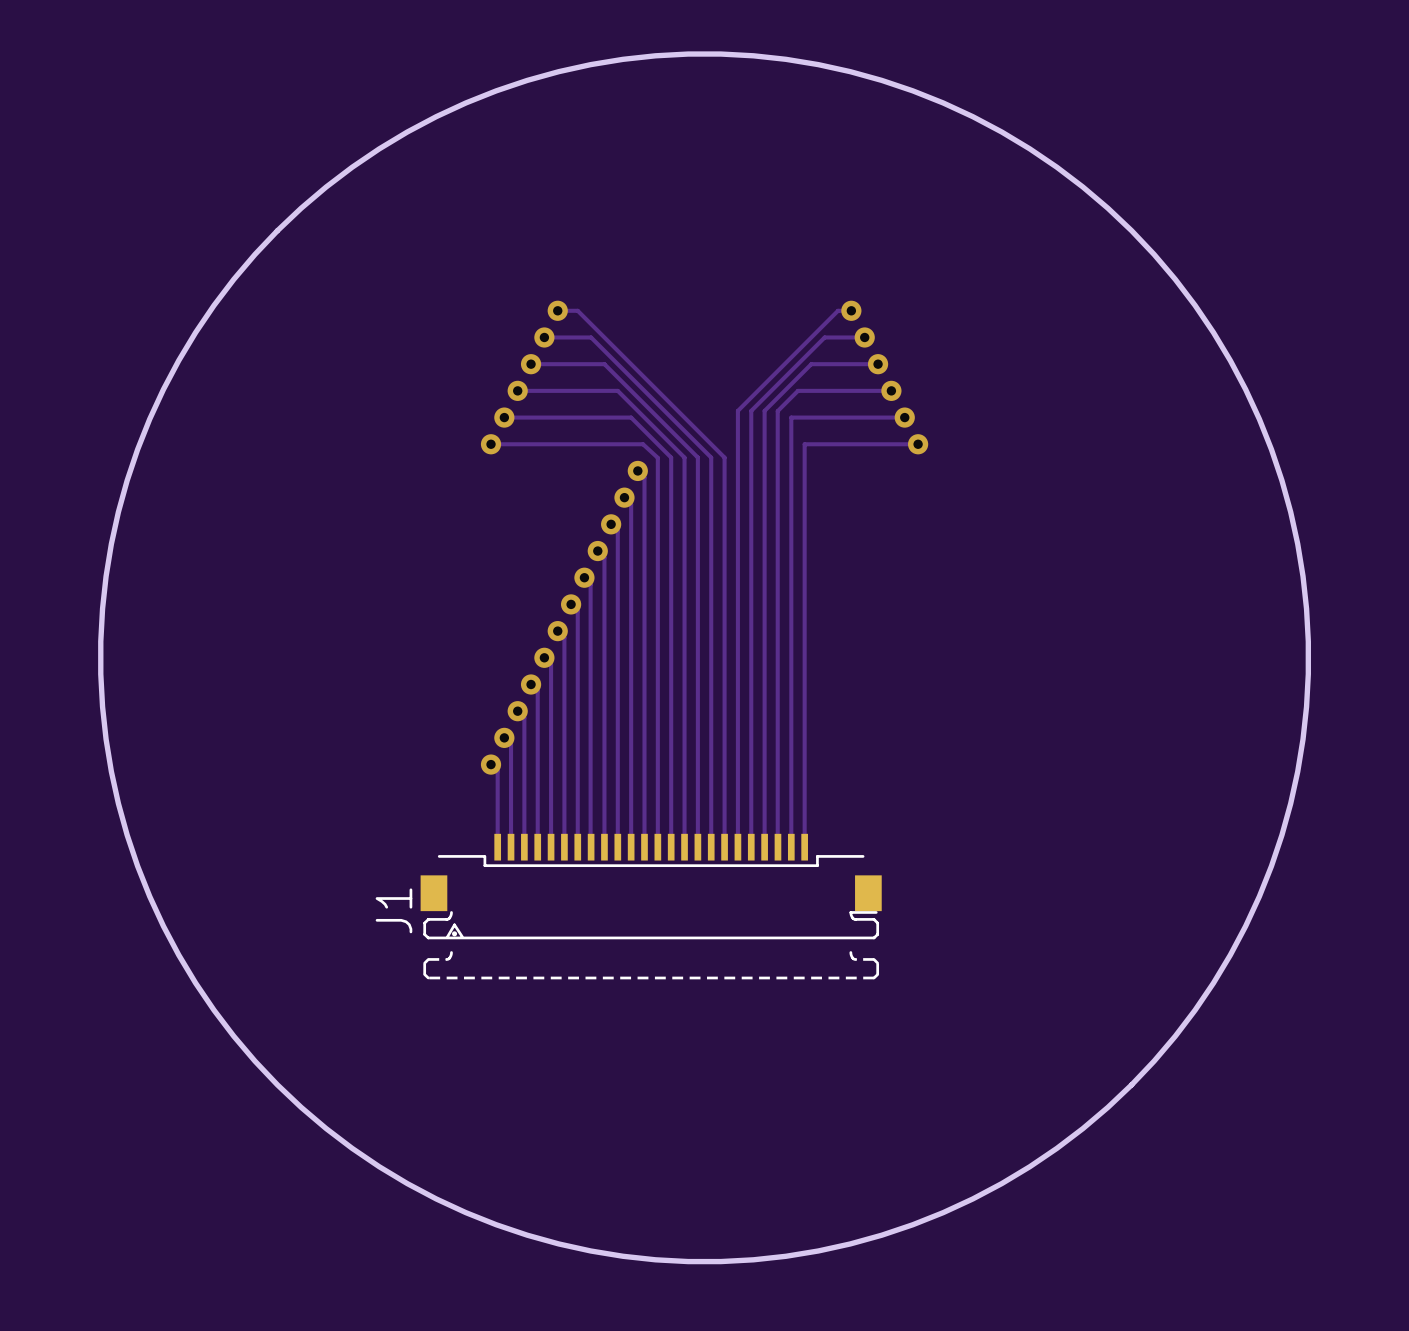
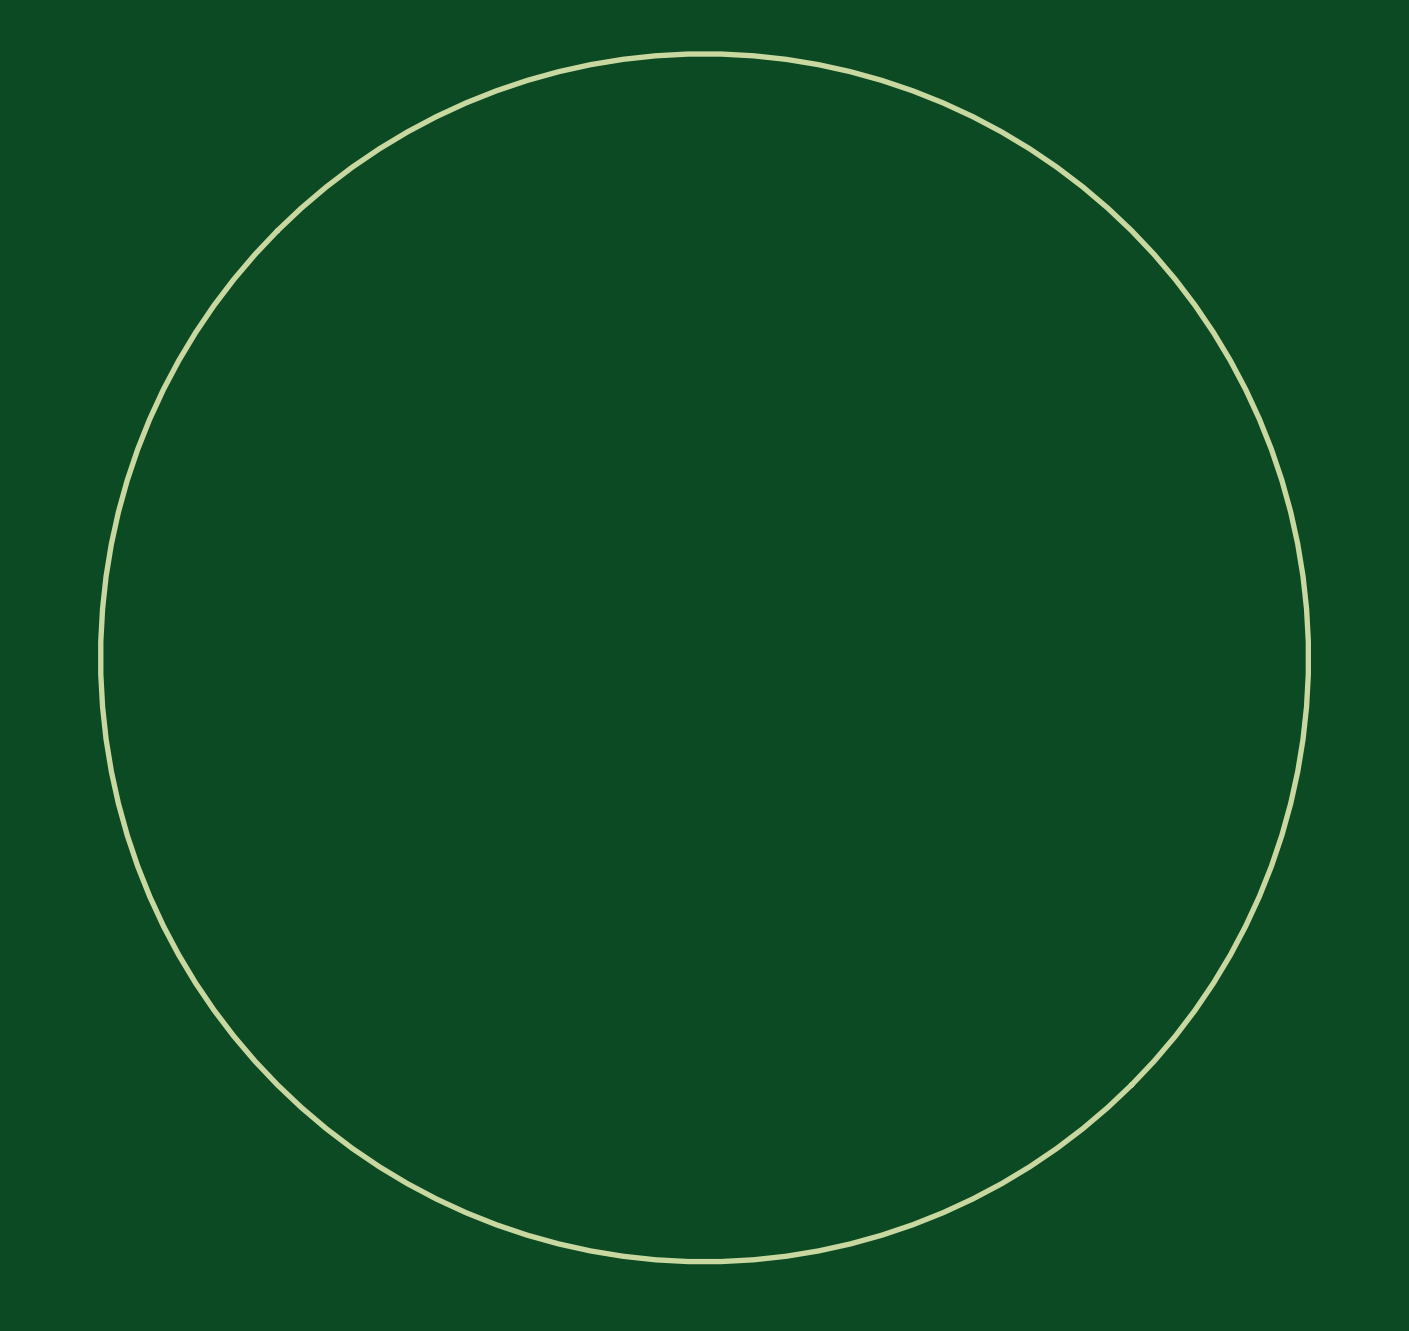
track: (557, 310) (577, 310) (724, 457) (724, 847) -> none
via: (557, 310) -> none
track: (851, 310) (838, 310) (737, 410) (737, 847) -> none
via: (851, 310) -> none
track: (544, 337) (591, 337) (711, 457) (711, 847) -> none
via: (544, 337) -> none
track: (864, 337) (824, 337) (751, 410) (751, 847) -> none
via: (864, 337) -> none
track: (531, 364) (604, 364) (697, 457) (697, 847) -> none
via: (531, 364) -> none
track: (878, 364) (811, 364) (764, 410) (764, 847) -> none
via: (878, 364) -> none
track: (517, 390) (617, 390) (684, 457) (684, 847) -> none
via: (517, 390) -> none
track: (891, 390) (797, 390) (777, 411) (777, 847) -> none
via: (891, 390) -> none
track: (504, 417) (631, 417) (671, 457) (671, 847) -> none
via: (504, 417) -> none
track: (904, 417) (791, 417) (791, 847) -> none
via: (904, 417) -> none
track: (491, 444) (643, 444) (657, 457) (657, 847) -> none
via: (491, 444) -> none
track: (918, 444) (804, 444) (804, 847) -> none
via: (918, 444) -> none
track: (637, 470) (644, 477) (644, 847) -> none
via: (637, 470) -> none
track: (624, 497) (631, 504) (631, 847) -> none
via: (624, 497) -> none
track: (611, 524) (617, 531) (617, 847) -> none
via: (611, 524) -> none
track: (597, 551) (604, 557) (604, 847) -> none
via: (597, 551) -> none
track: (584, 577) (590, 584) (591, 847) -> none
via: (584, 577) -> none
track: (571, 604) (577, 611) (577, 847) -> none
via: (571, 604) -> none
track: (557, 631) (564, 637) (564, 855) -> none
via: (557, 631) -> none
track: (544, 657) (551, 664) (551, 847) -> none
via: (544, 657) -> none
track: (531, 684) (537, 691) (537, 847) -> none
via: (531, 684) -> none
track: (517, 711) (524, 717) (524, 847) -> none
via: (517, 711) -> none
track: (504, 737) (511, 744) (511, 847) -> none
via: (504, 737) -> none
track: (491, 764) (497, 771) (497, 847) -> none
via: (491, 764) -> none
J1: (651, 906) -> none

